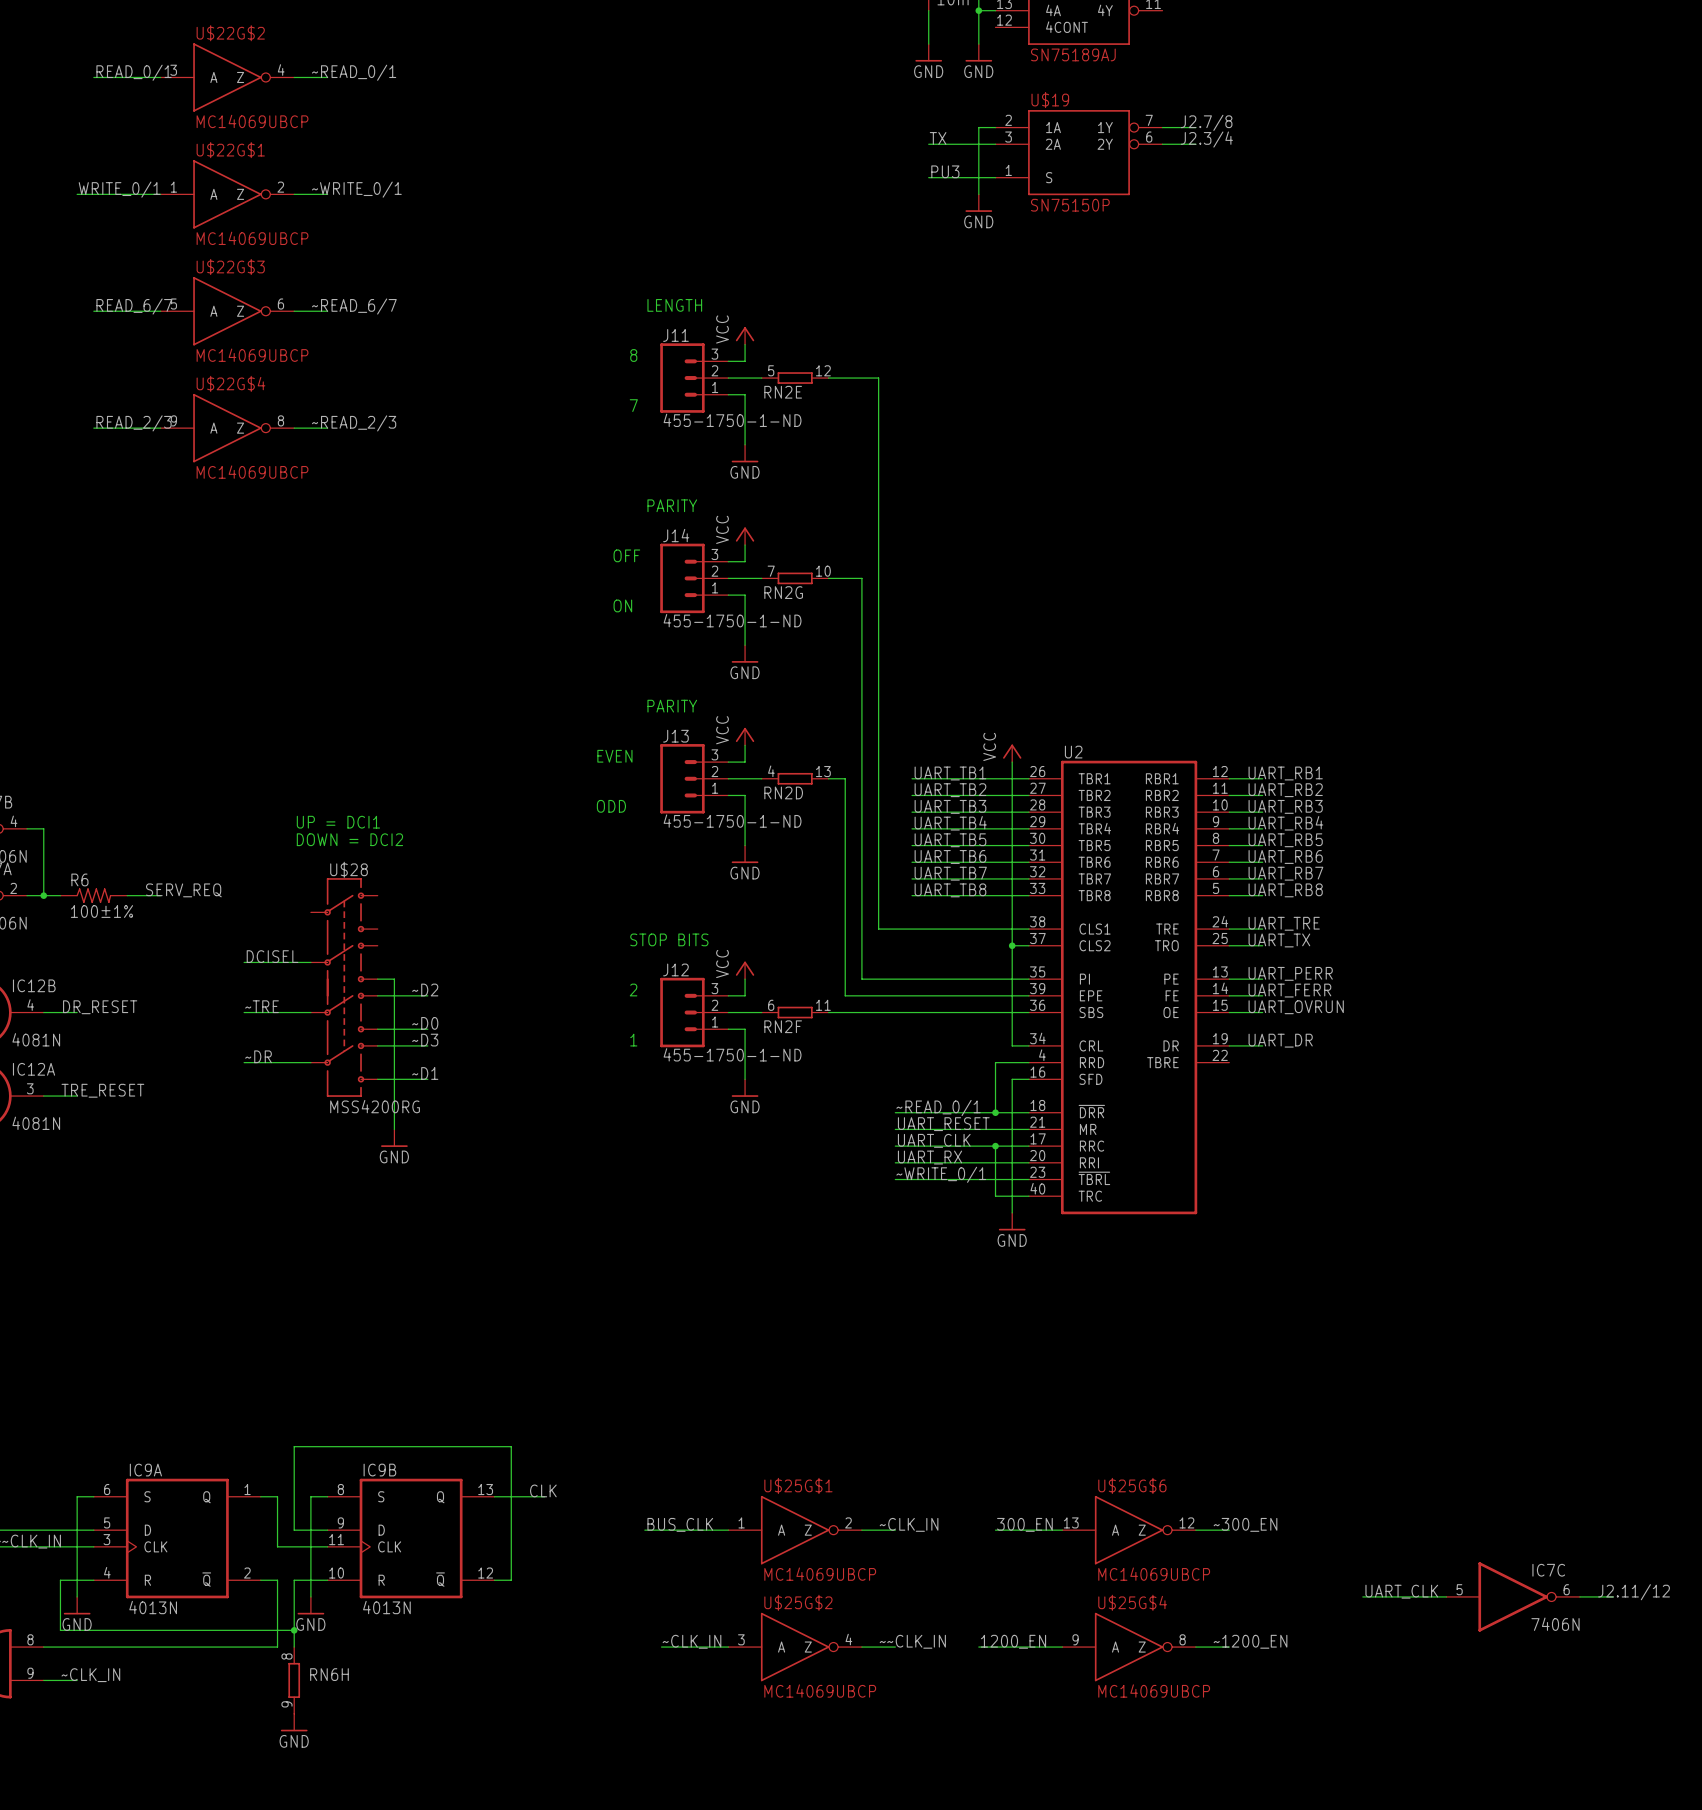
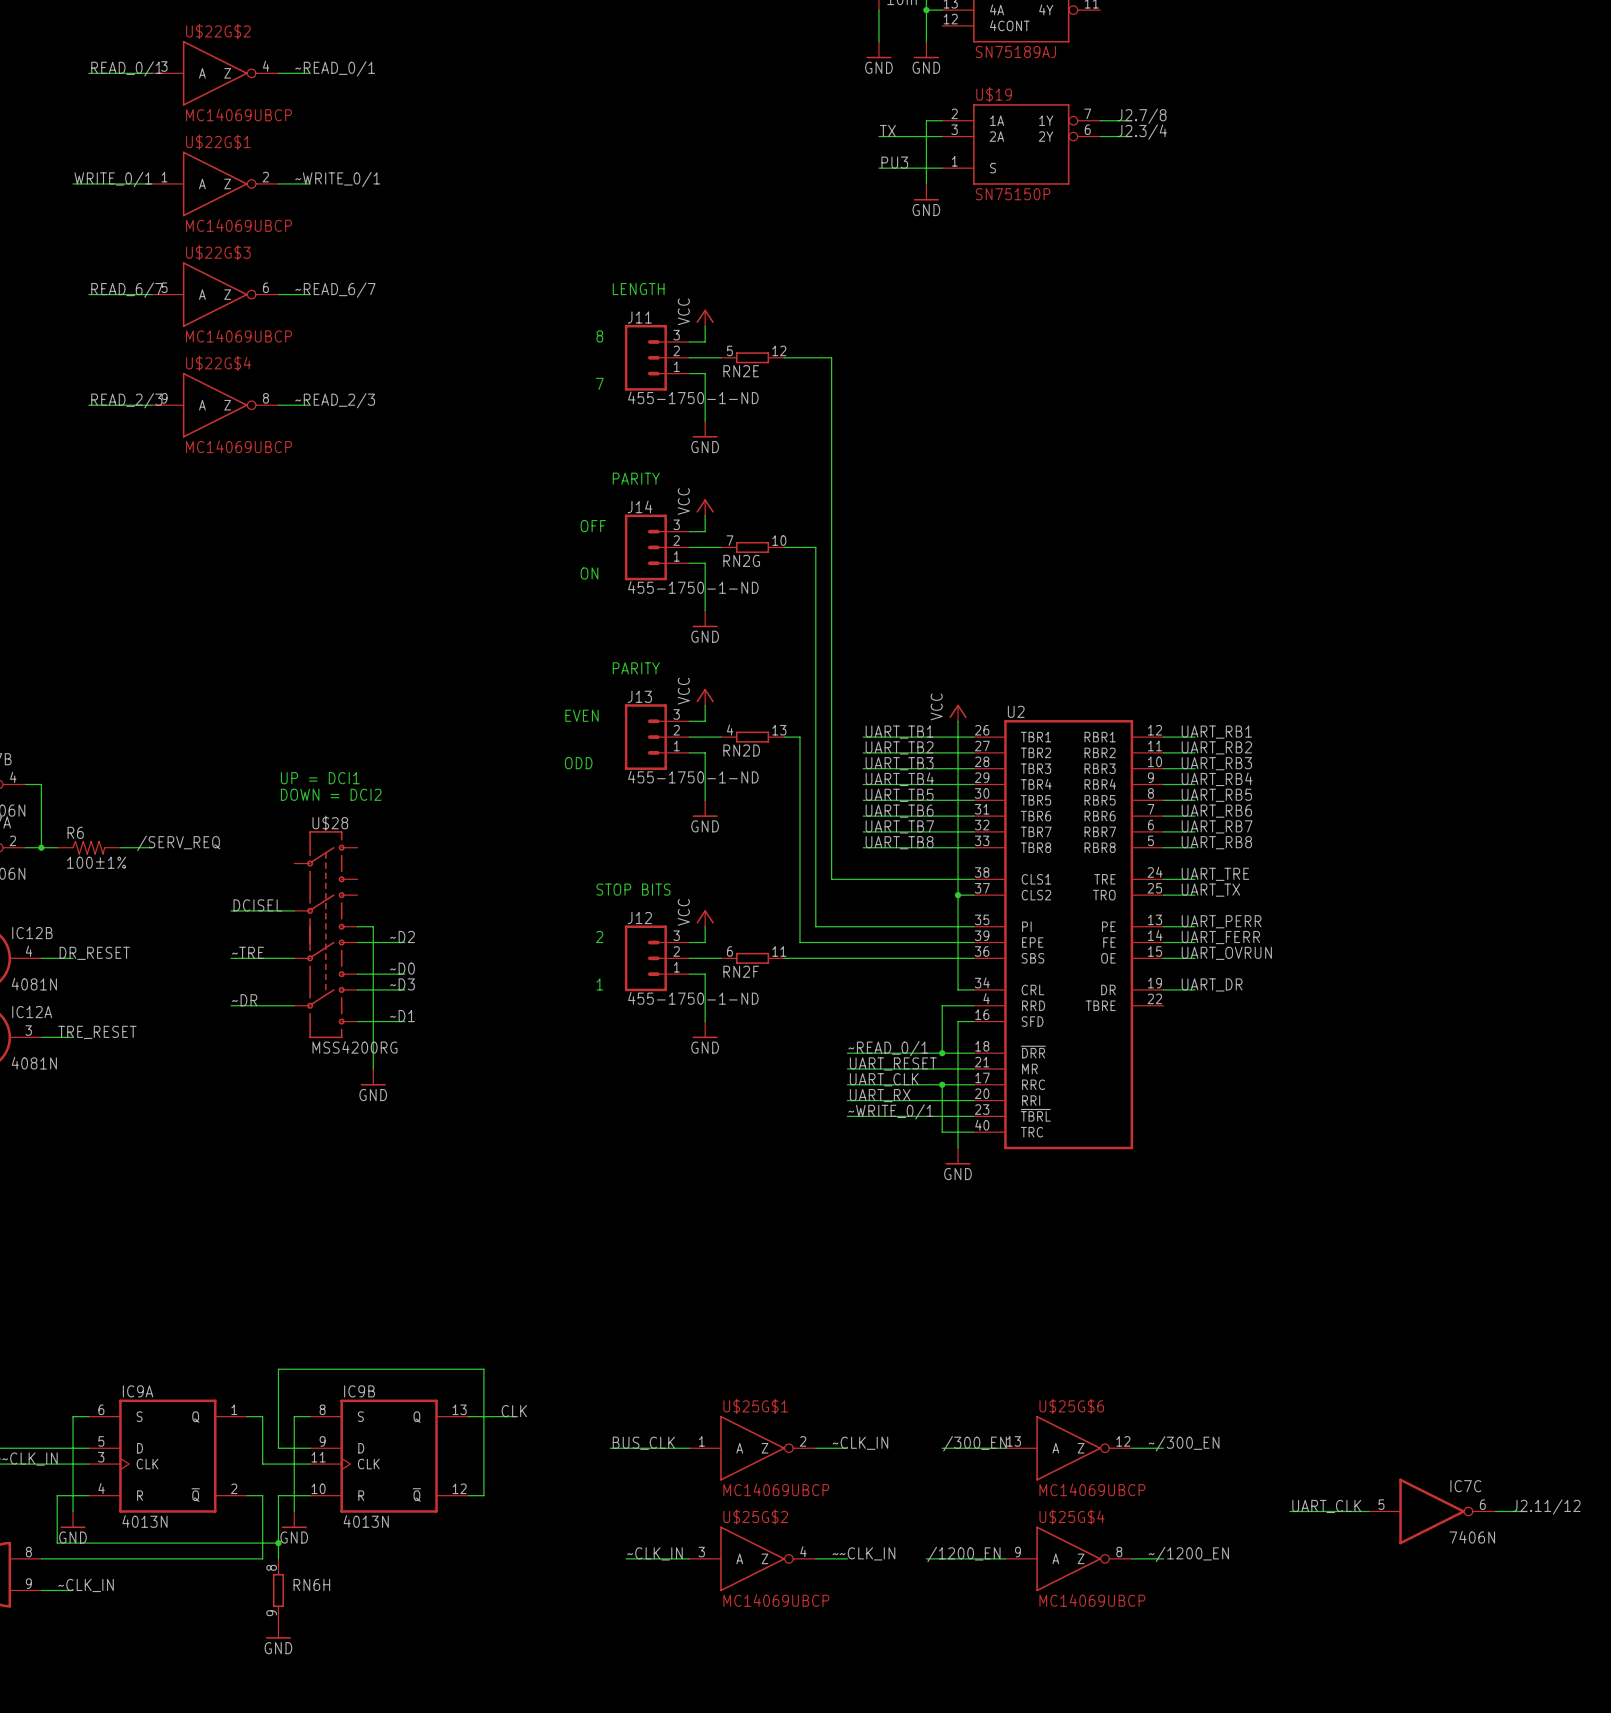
label: SERV_REQ (183, 890) -> /SERV_REQ (178, 843)
label: 300_EN (1024, 1524) -> /300_EN (975, 1443)
label: ~300_EN (1245, 1524) -> ~/300_EN (1184, 1443)
label: 1200_EN (1013, 1641) -> /1200_EN (963, 1554)
label: ~1200_EN (1250, 1641) -> ~/1200_EN (1188, 1554)

